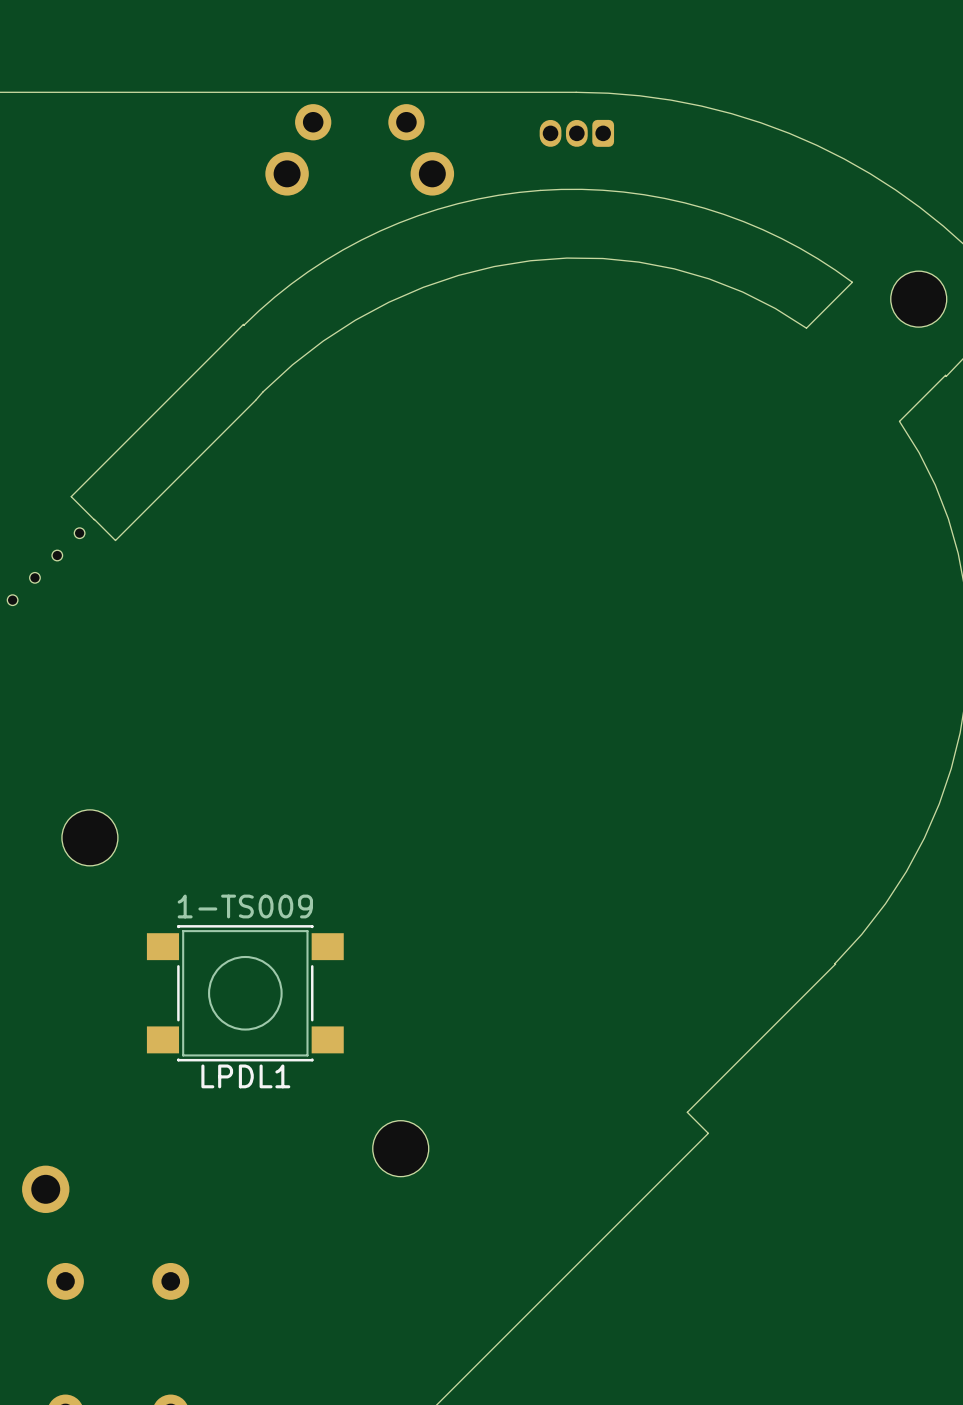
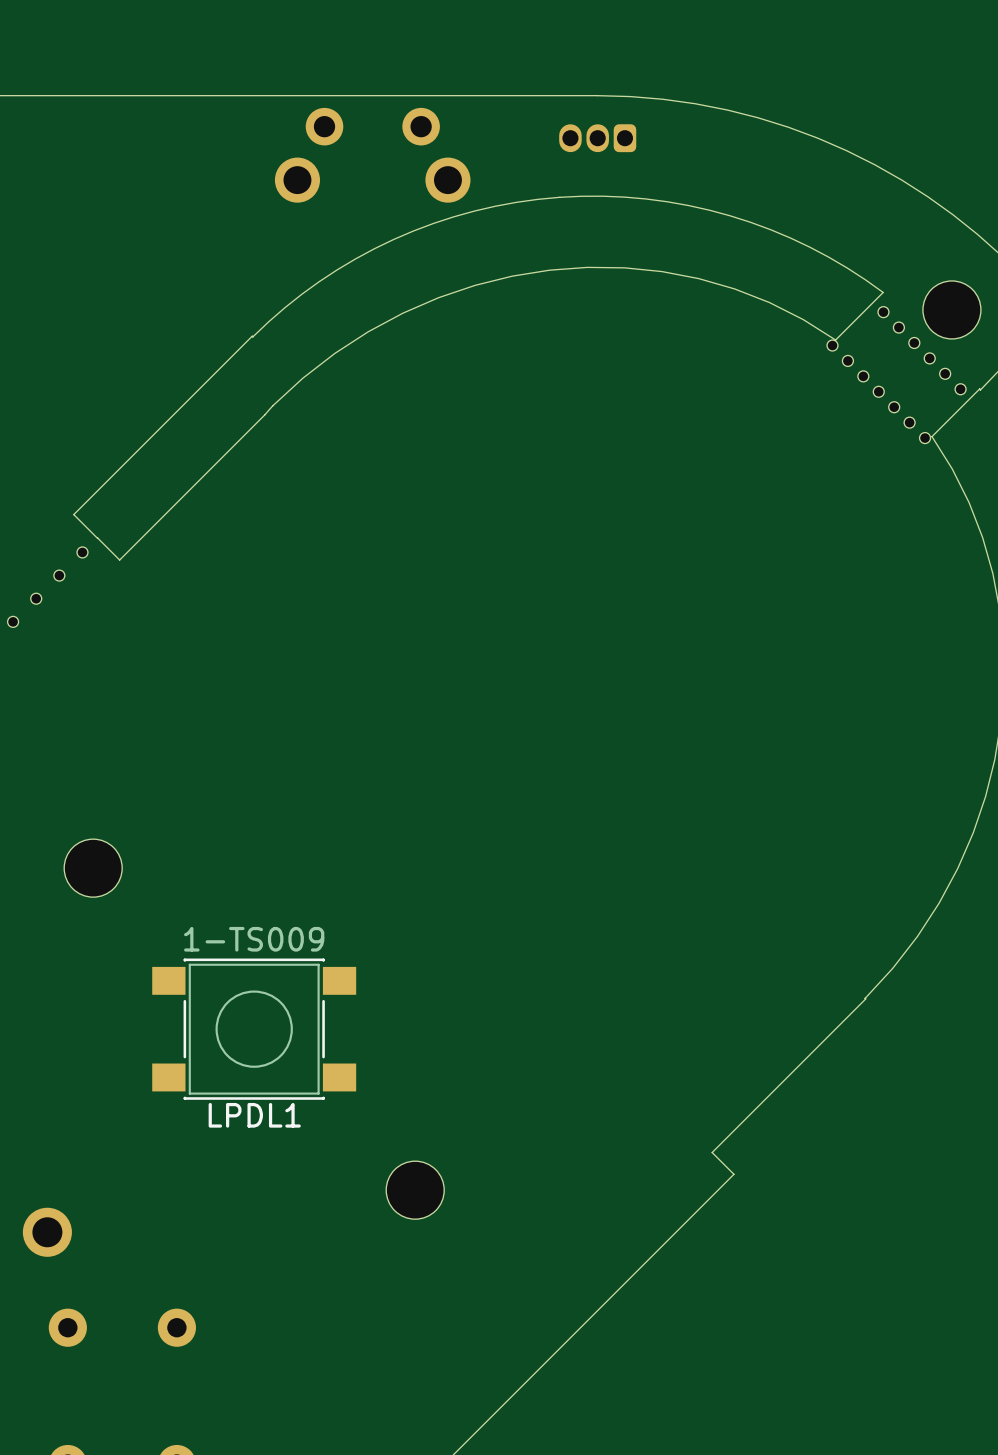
part: none -> (922, 350)
part: none -> (878, 391)

